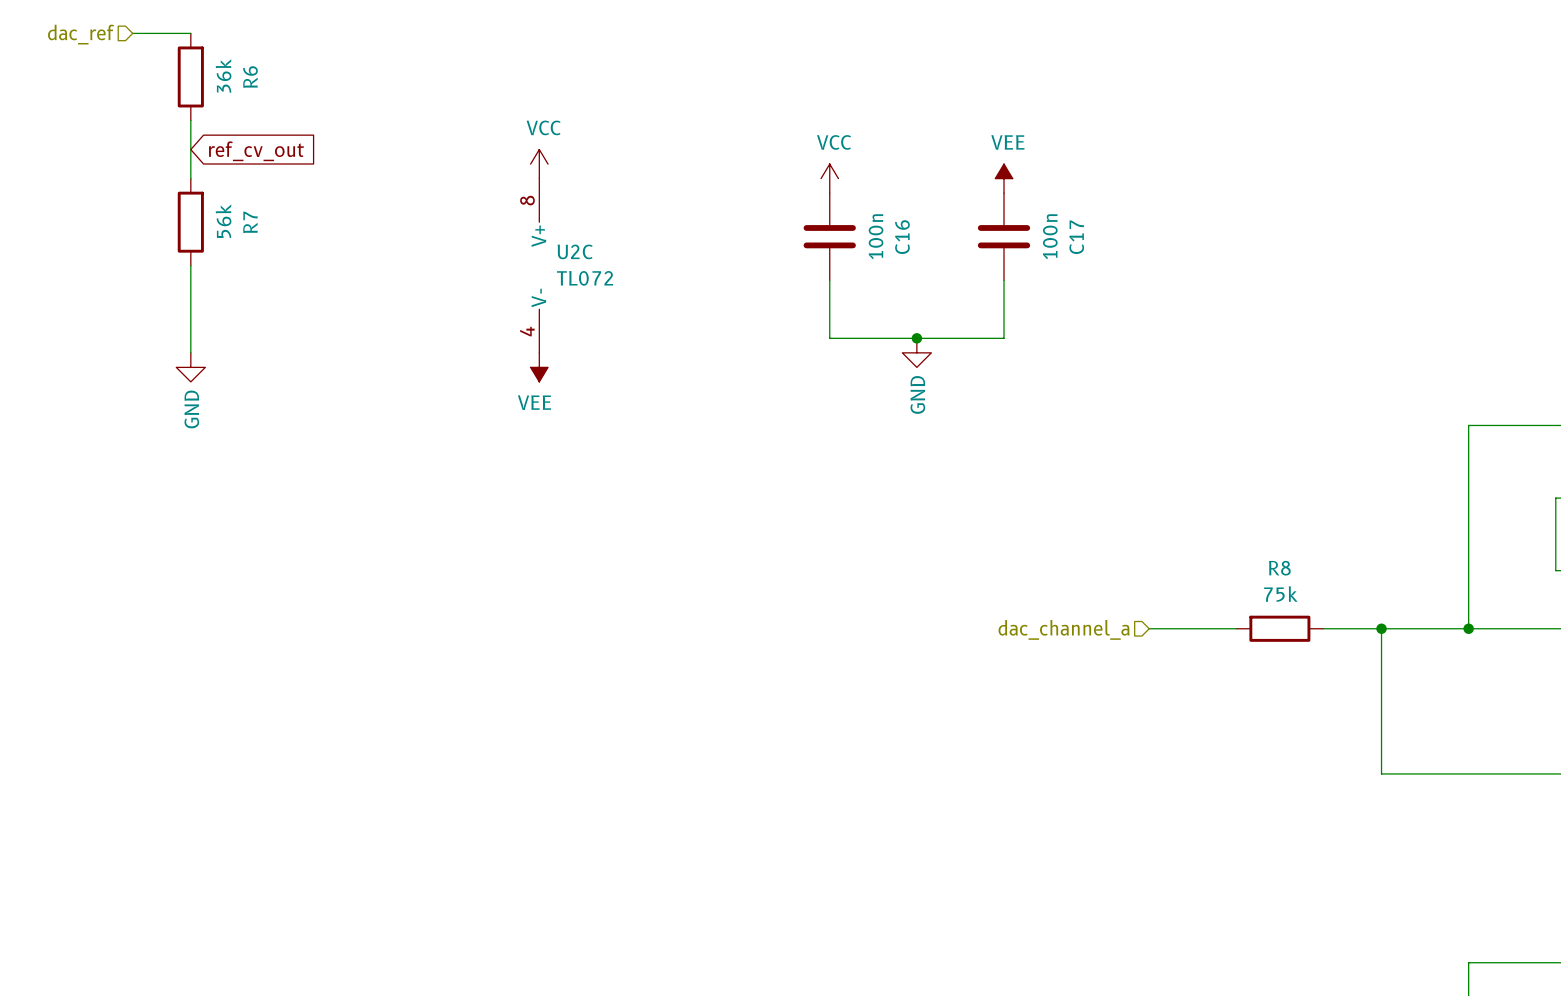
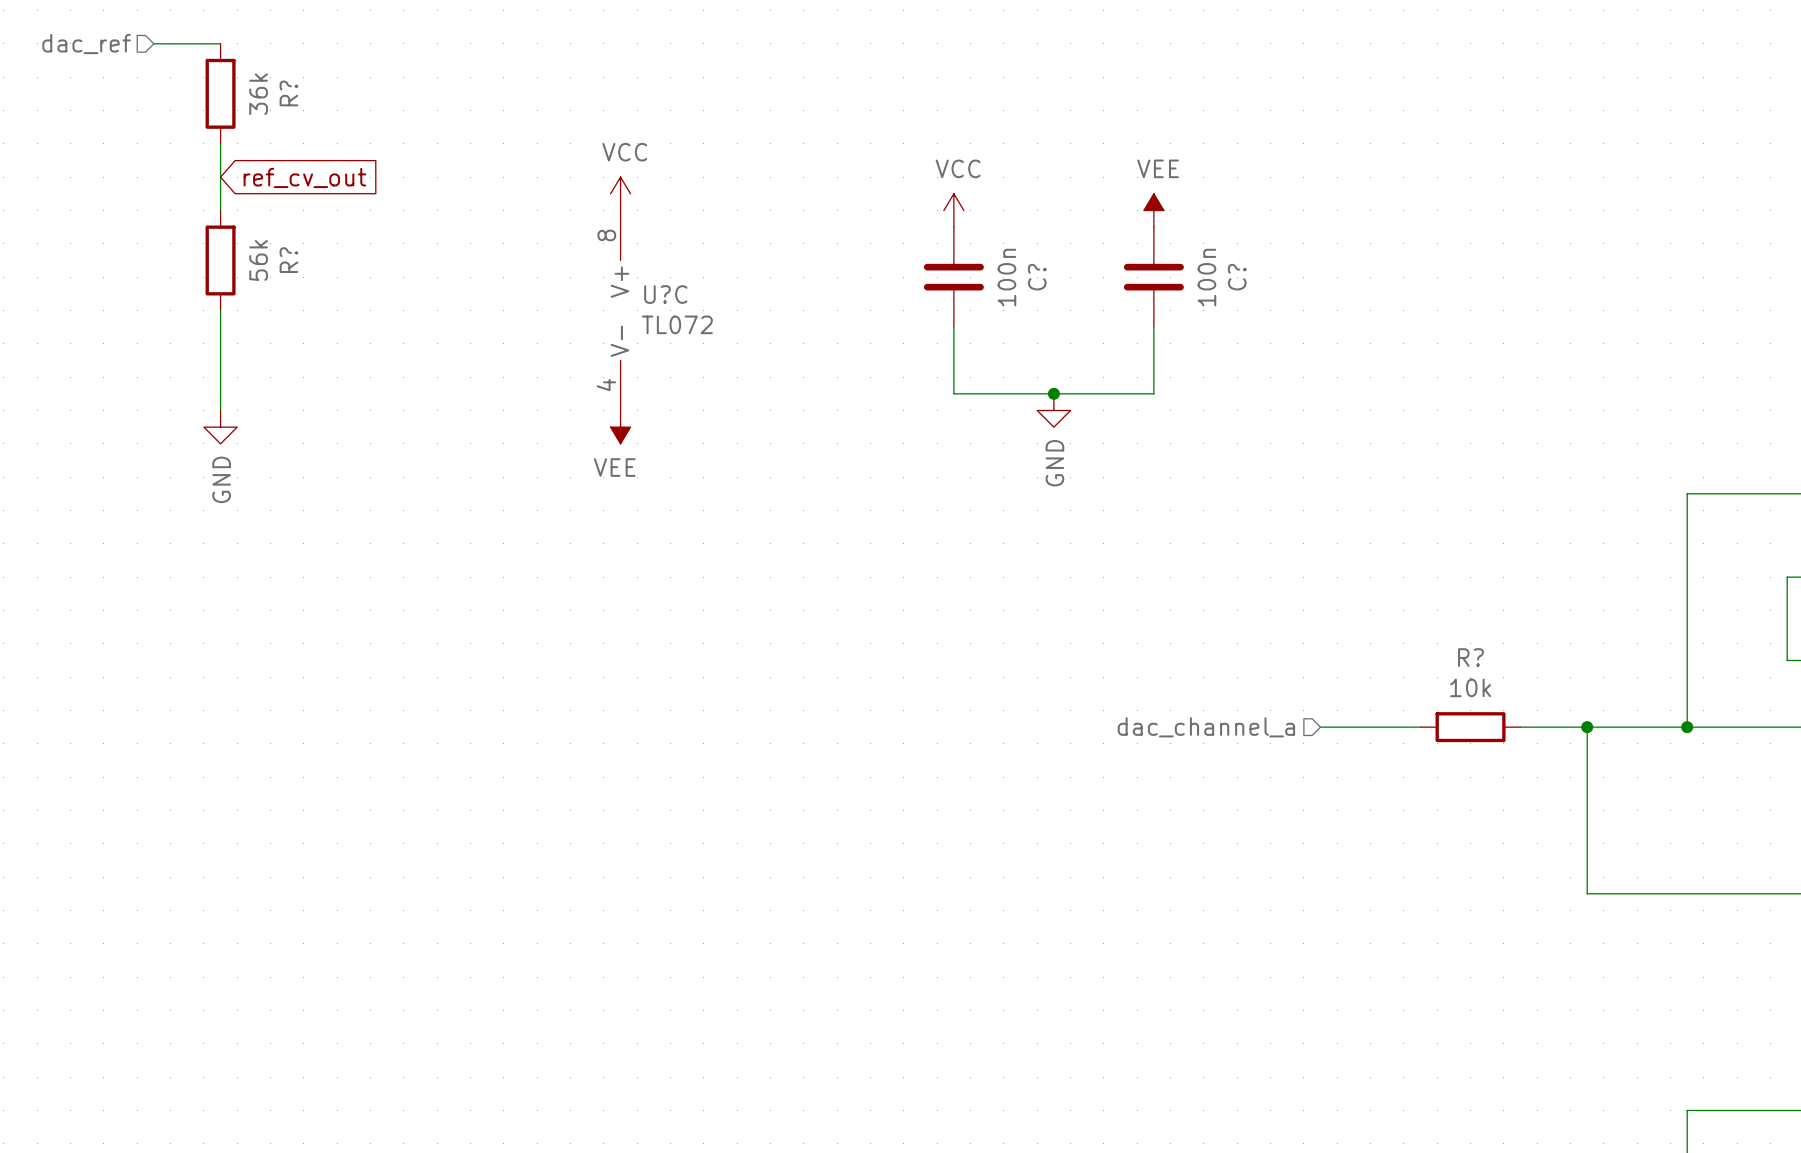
R6 name: R6 (250, 77) -> R? (288, 93)
R7 name: R7 (250, 222) -> R? (288, 260)
C16 name: C16 (902, 237) -> C? (1037, 277)
C17 name: C17 (1076, 237) -> C? (1237, 277)
U2C name: U2C (575, 251) -> U?C (665, 294)
R8 name: R8 (1279, 568) -> R? (1470, 657)
R8 value: 75k (1280, 594) -> 10k (1470, 687)

